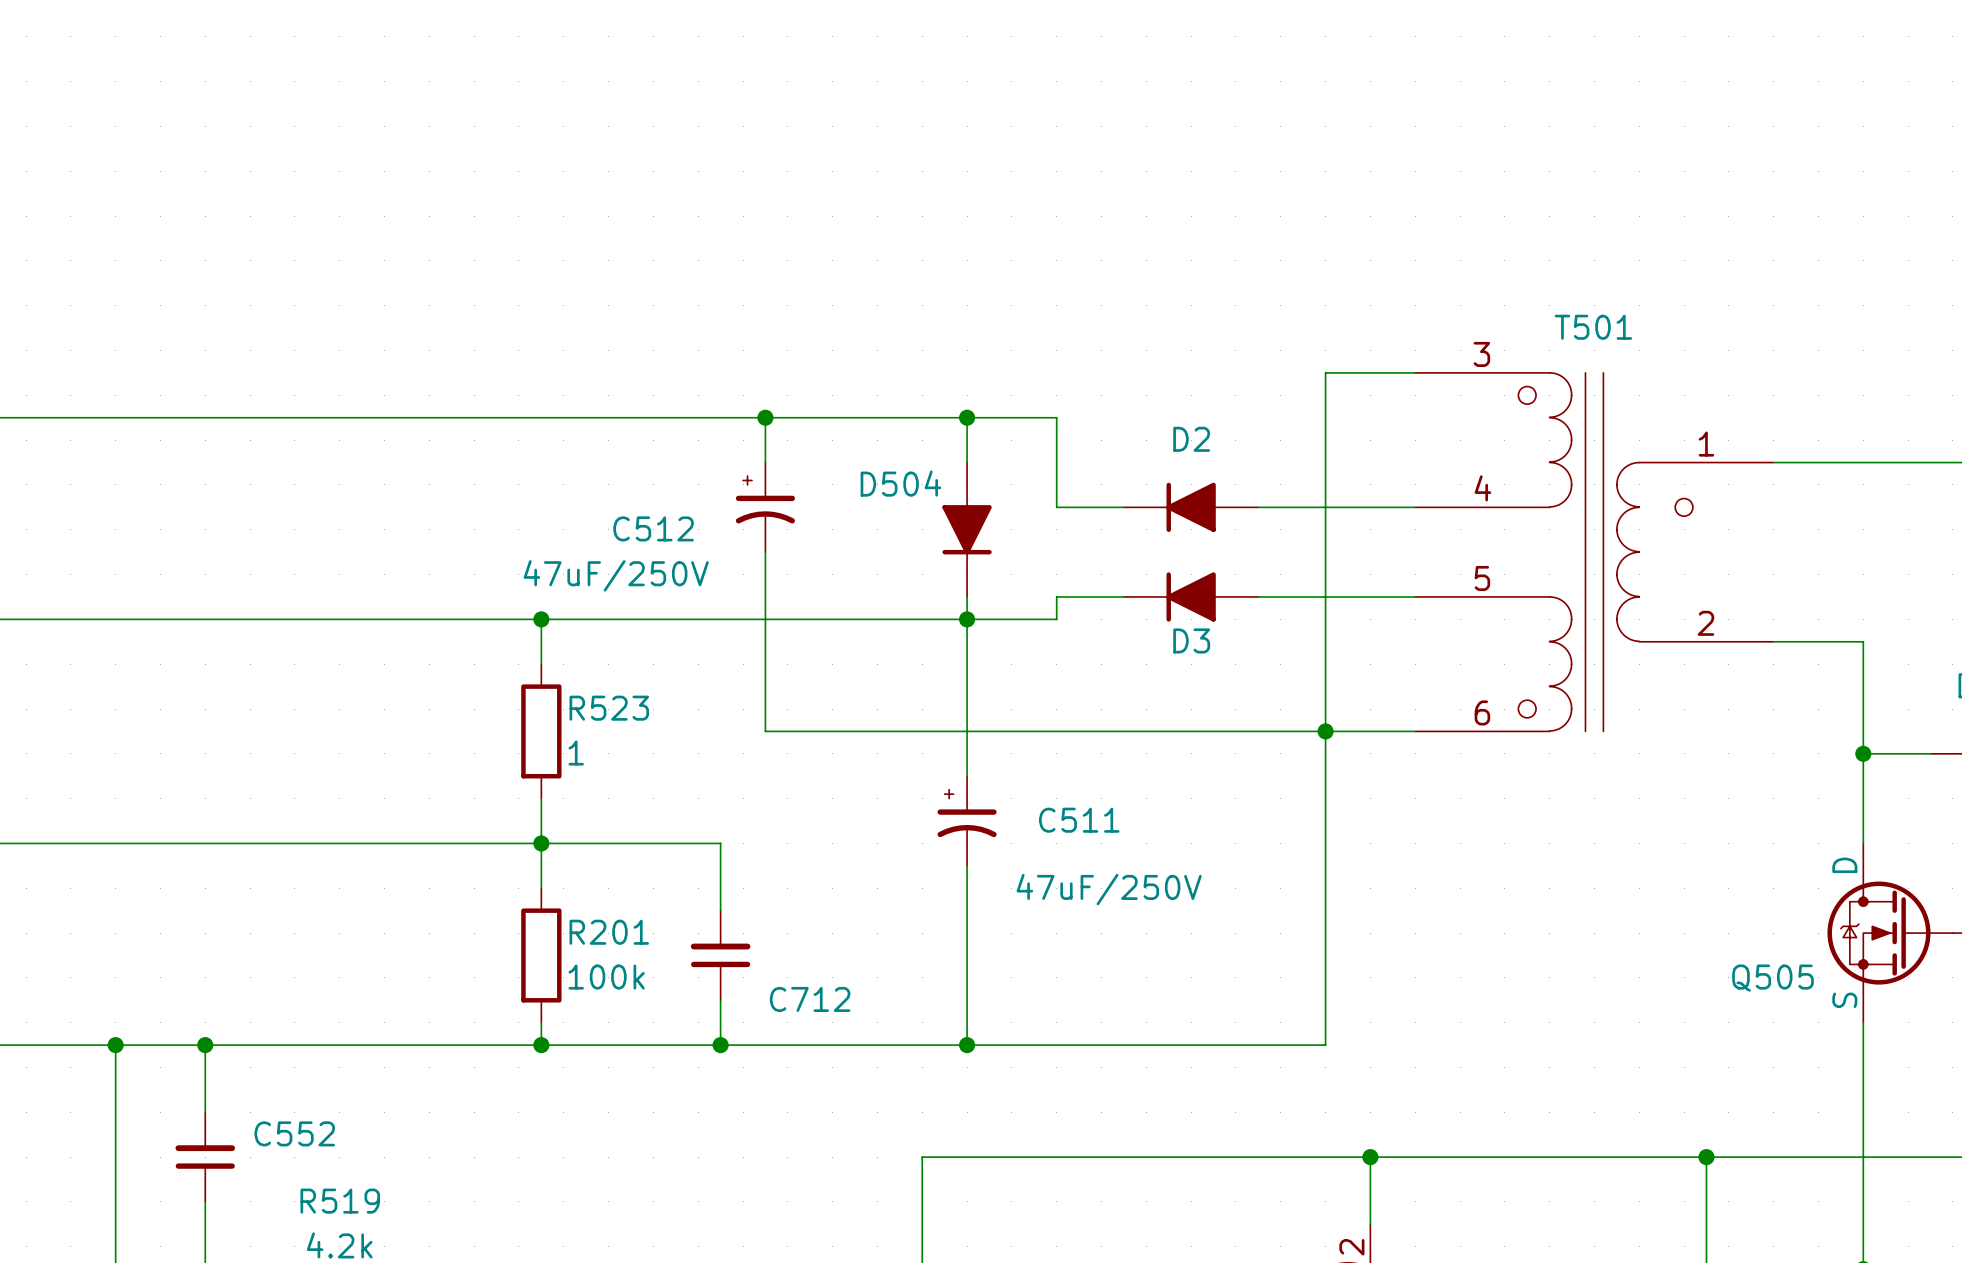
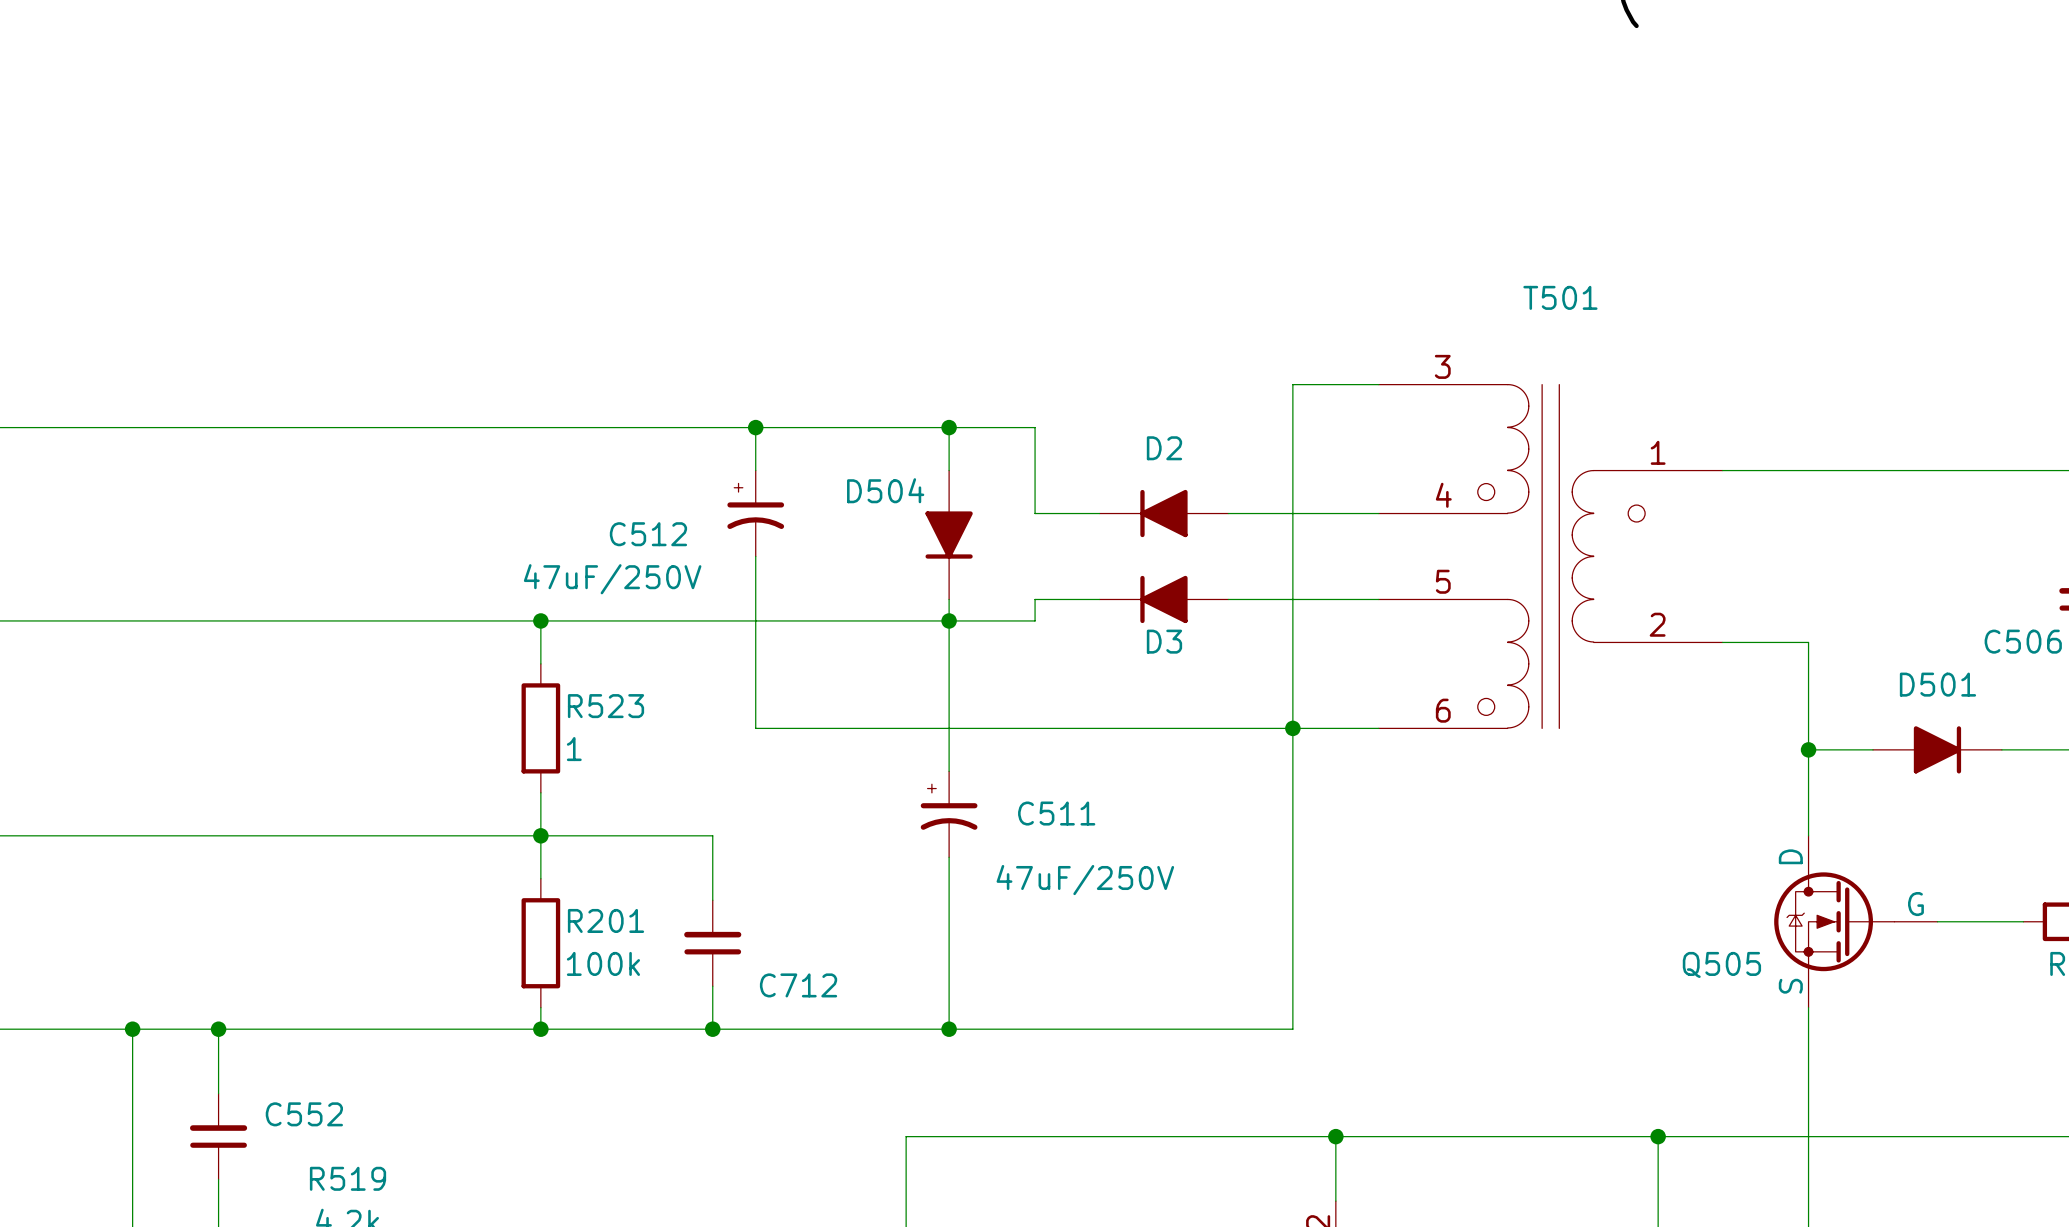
T501 name position: T501 (1593, 327) -> T501 (1560, 297)
T501 symbol: [1415, 372, 1774, 732] -> [1378, 384, 1723, 729]

